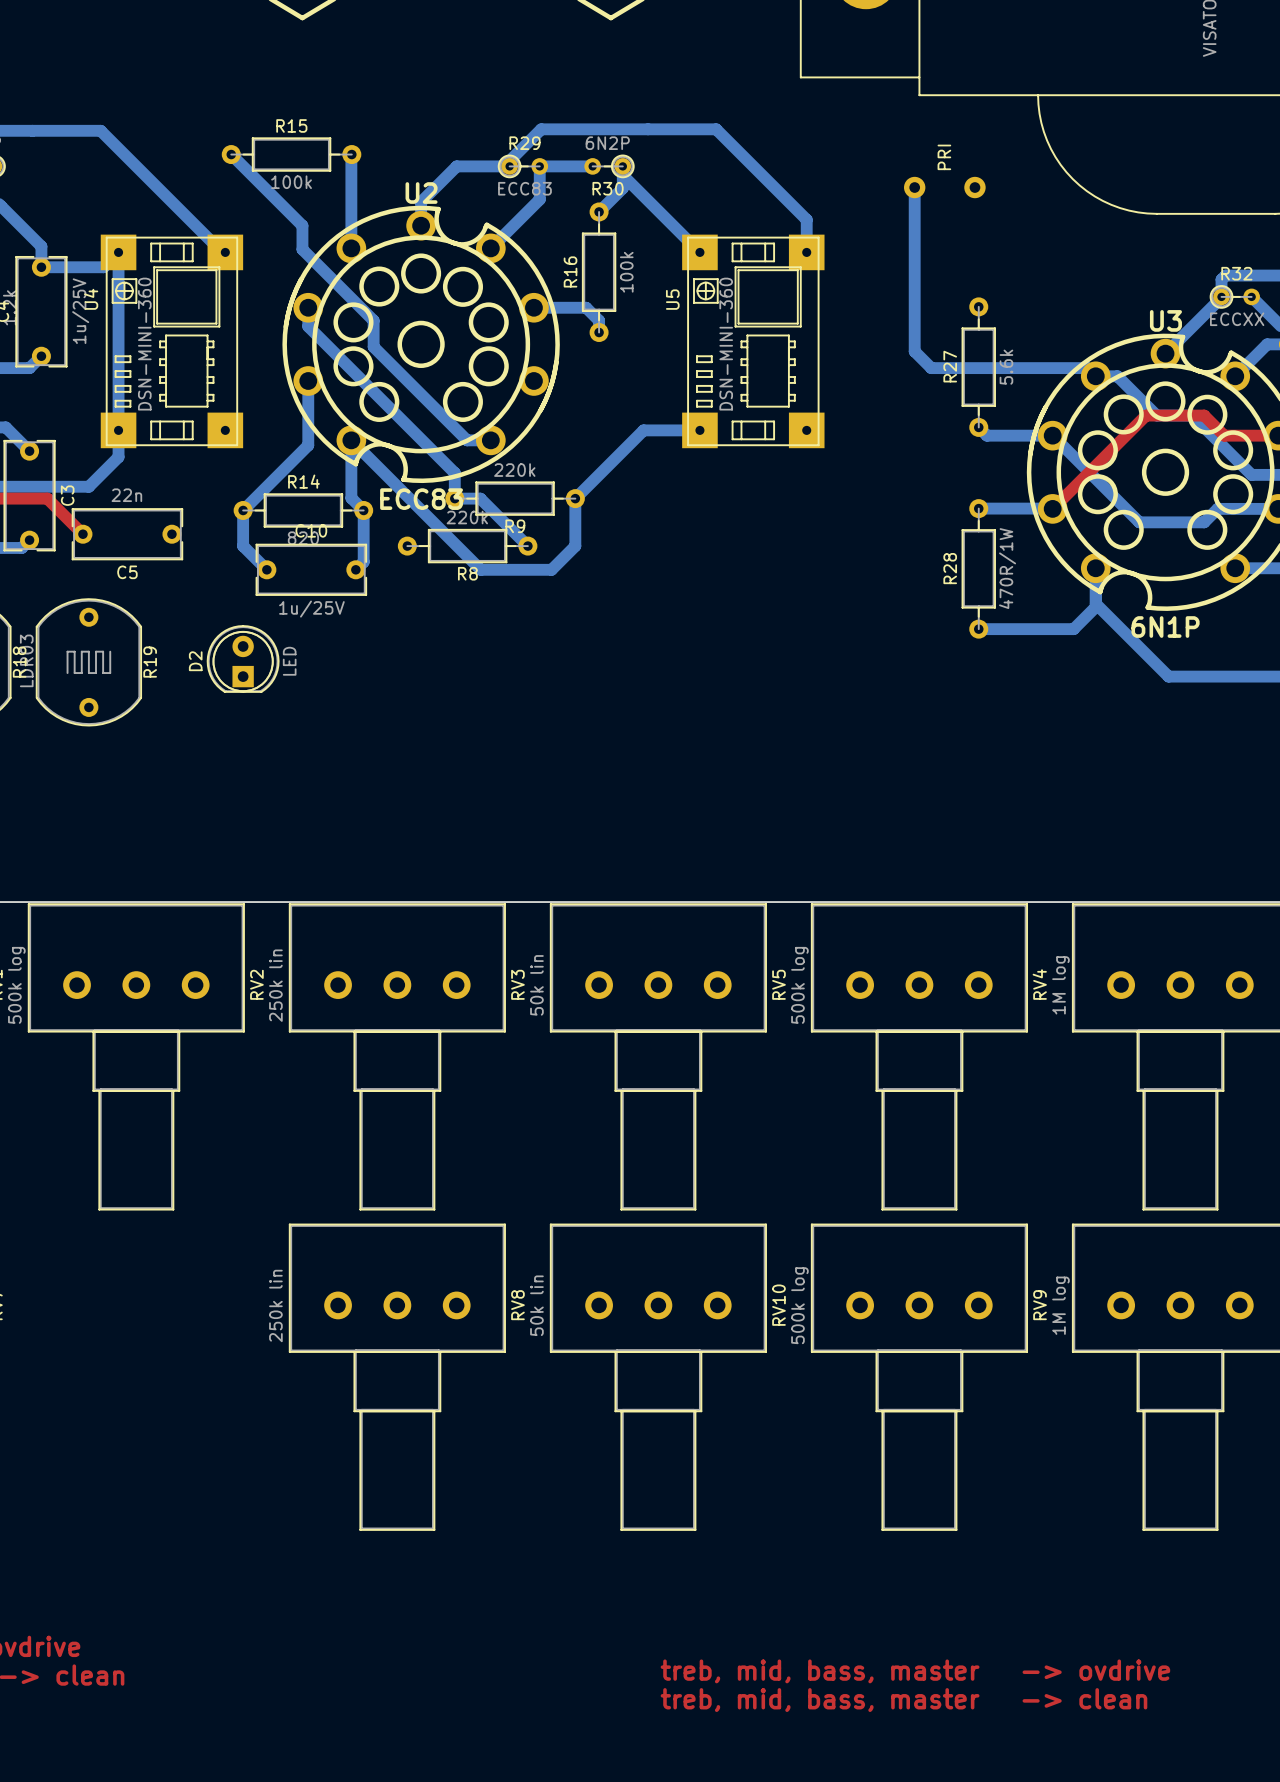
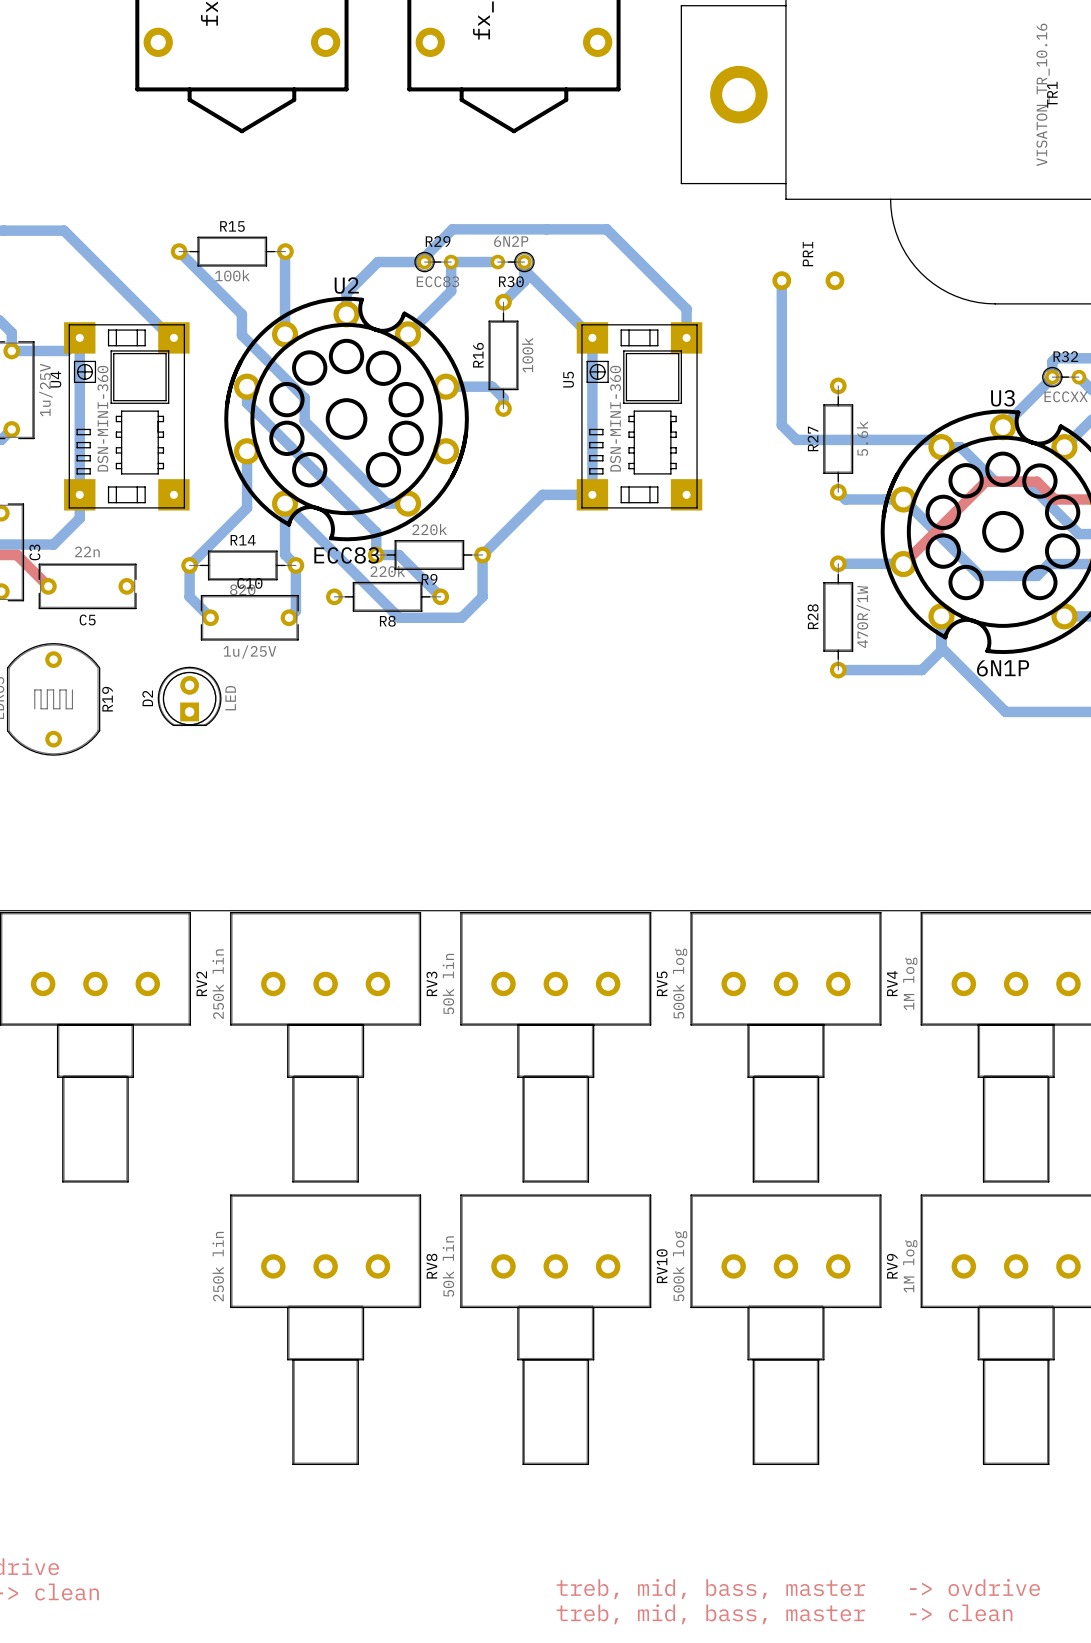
bottom track: none -> (592, 337) (592, 494)

